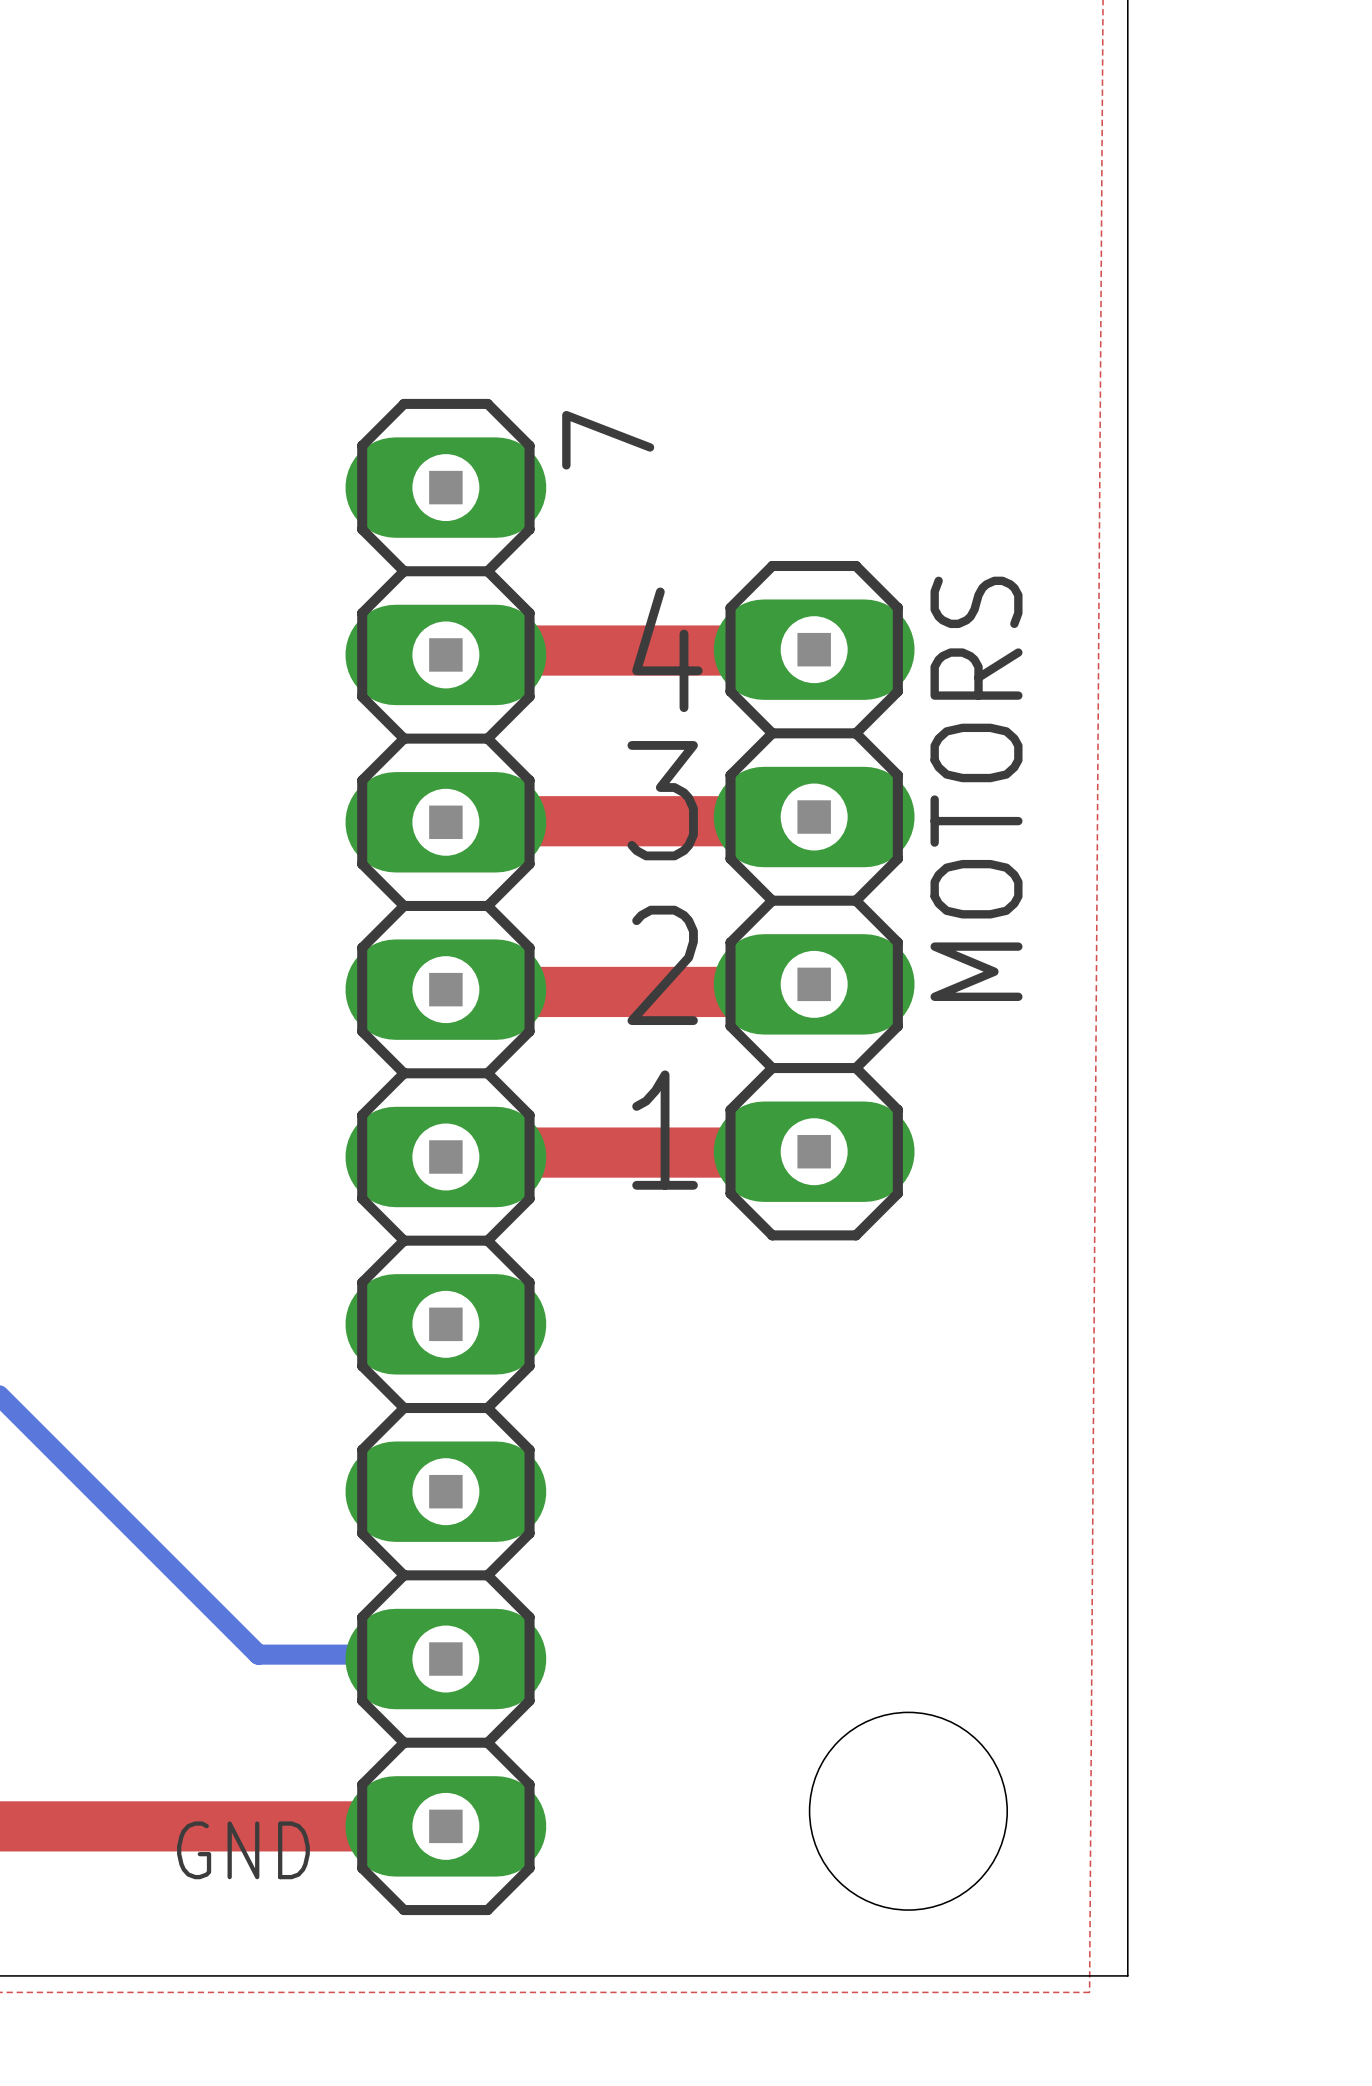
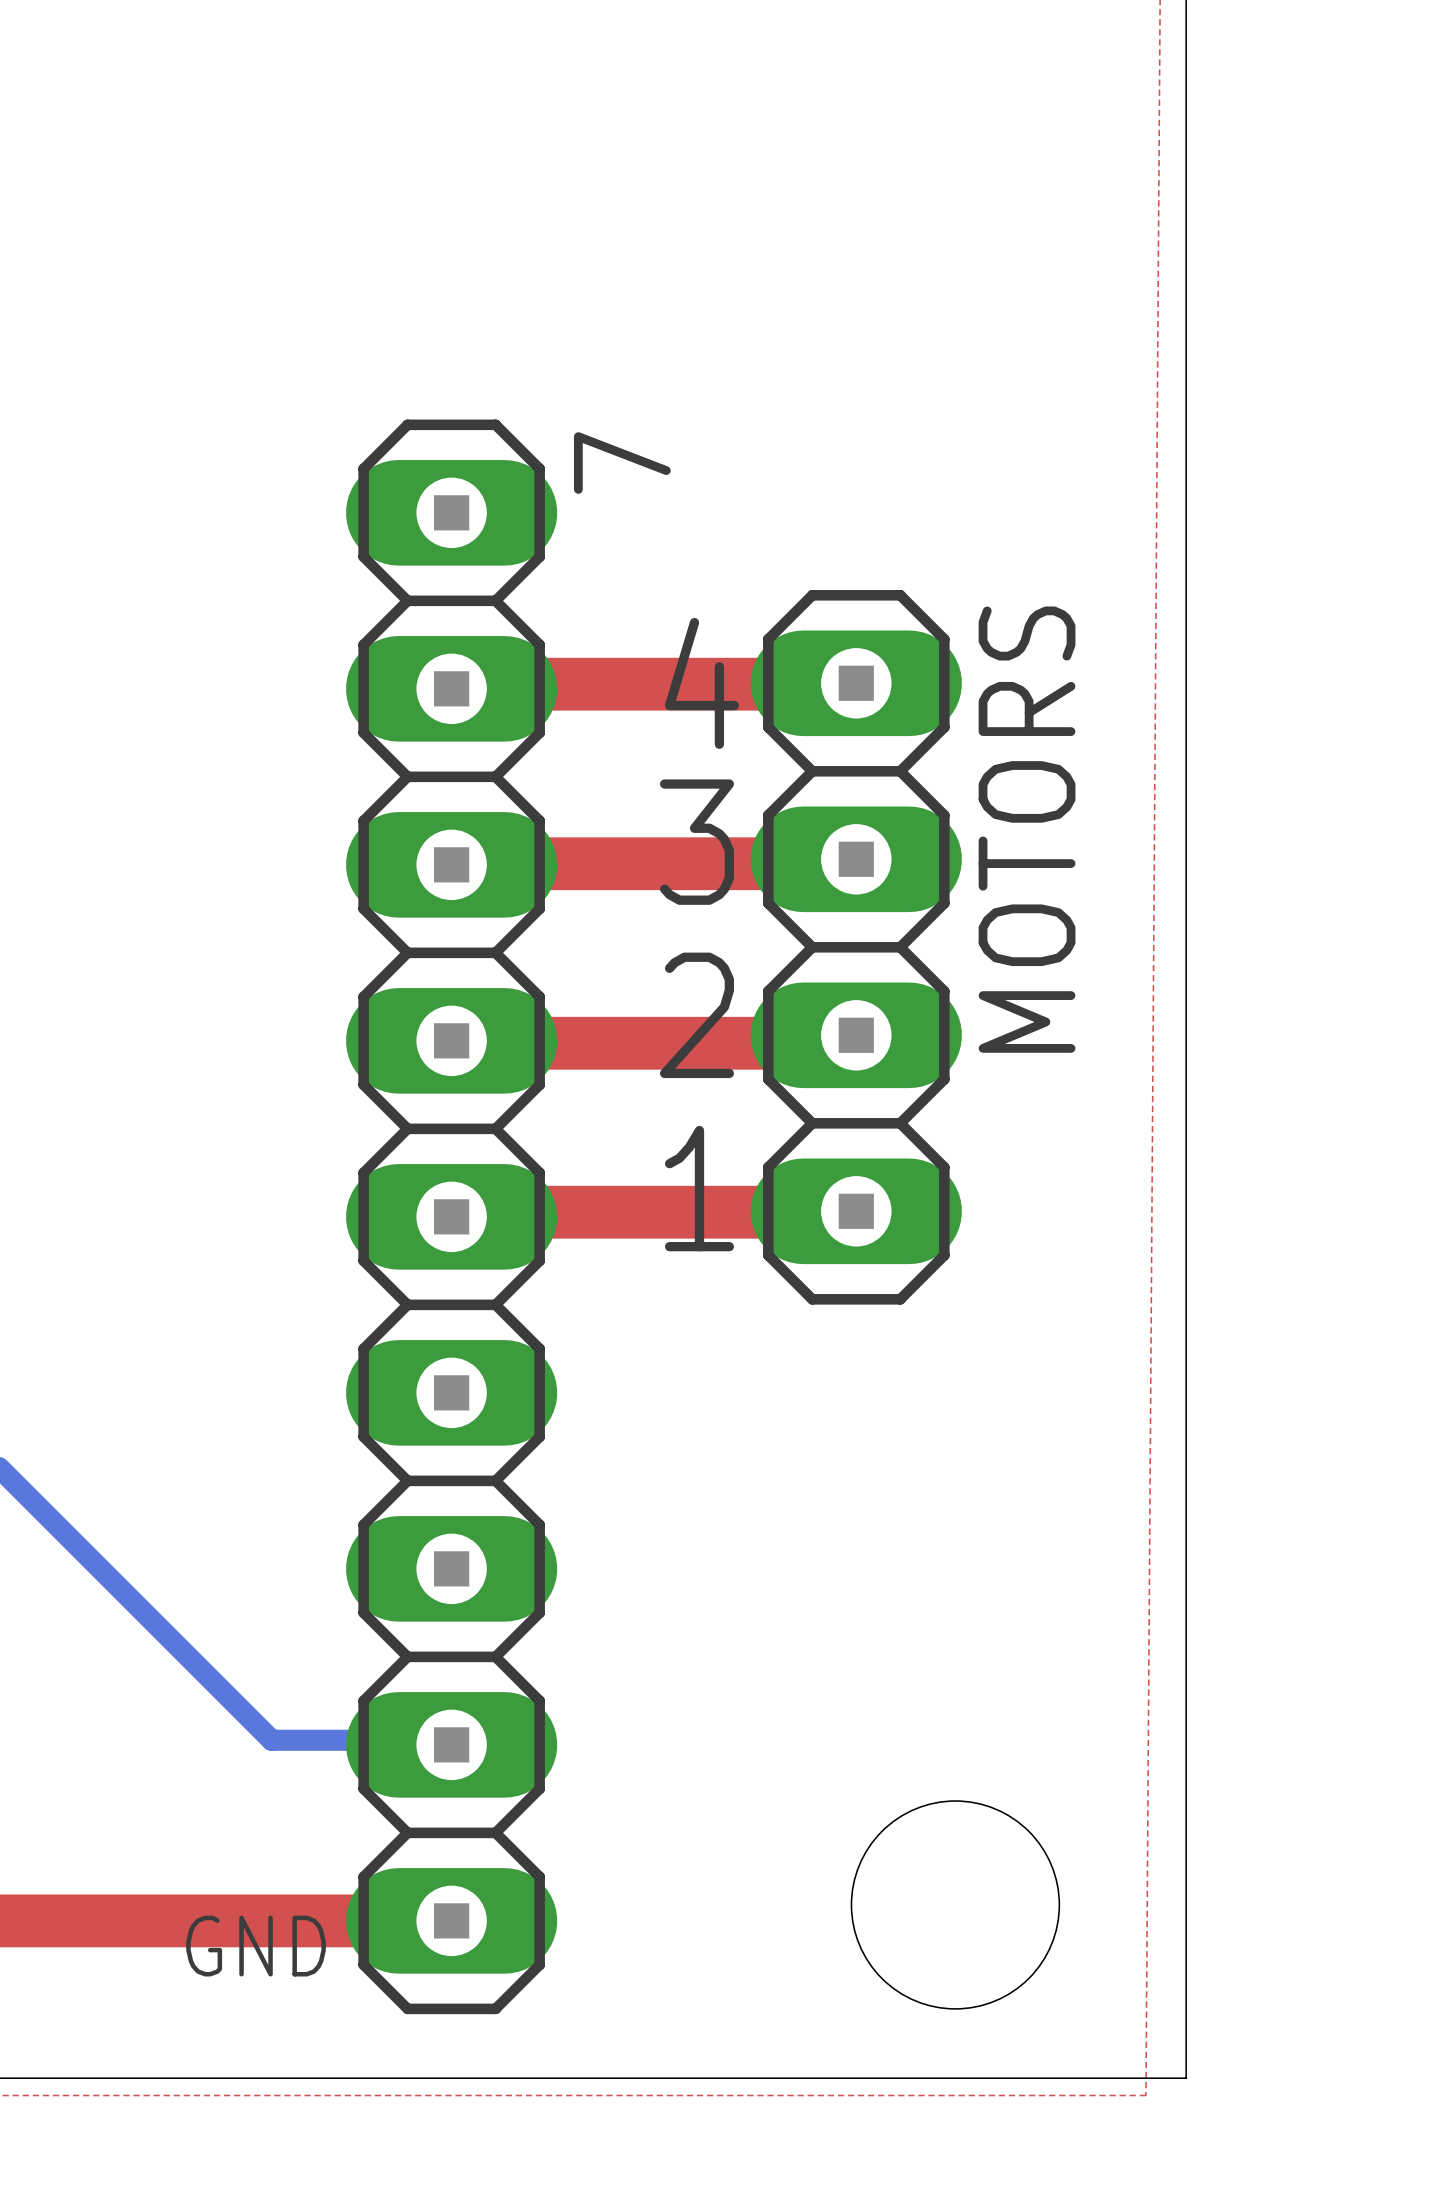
7 position: (445, 1156) -> (451, 1216)

